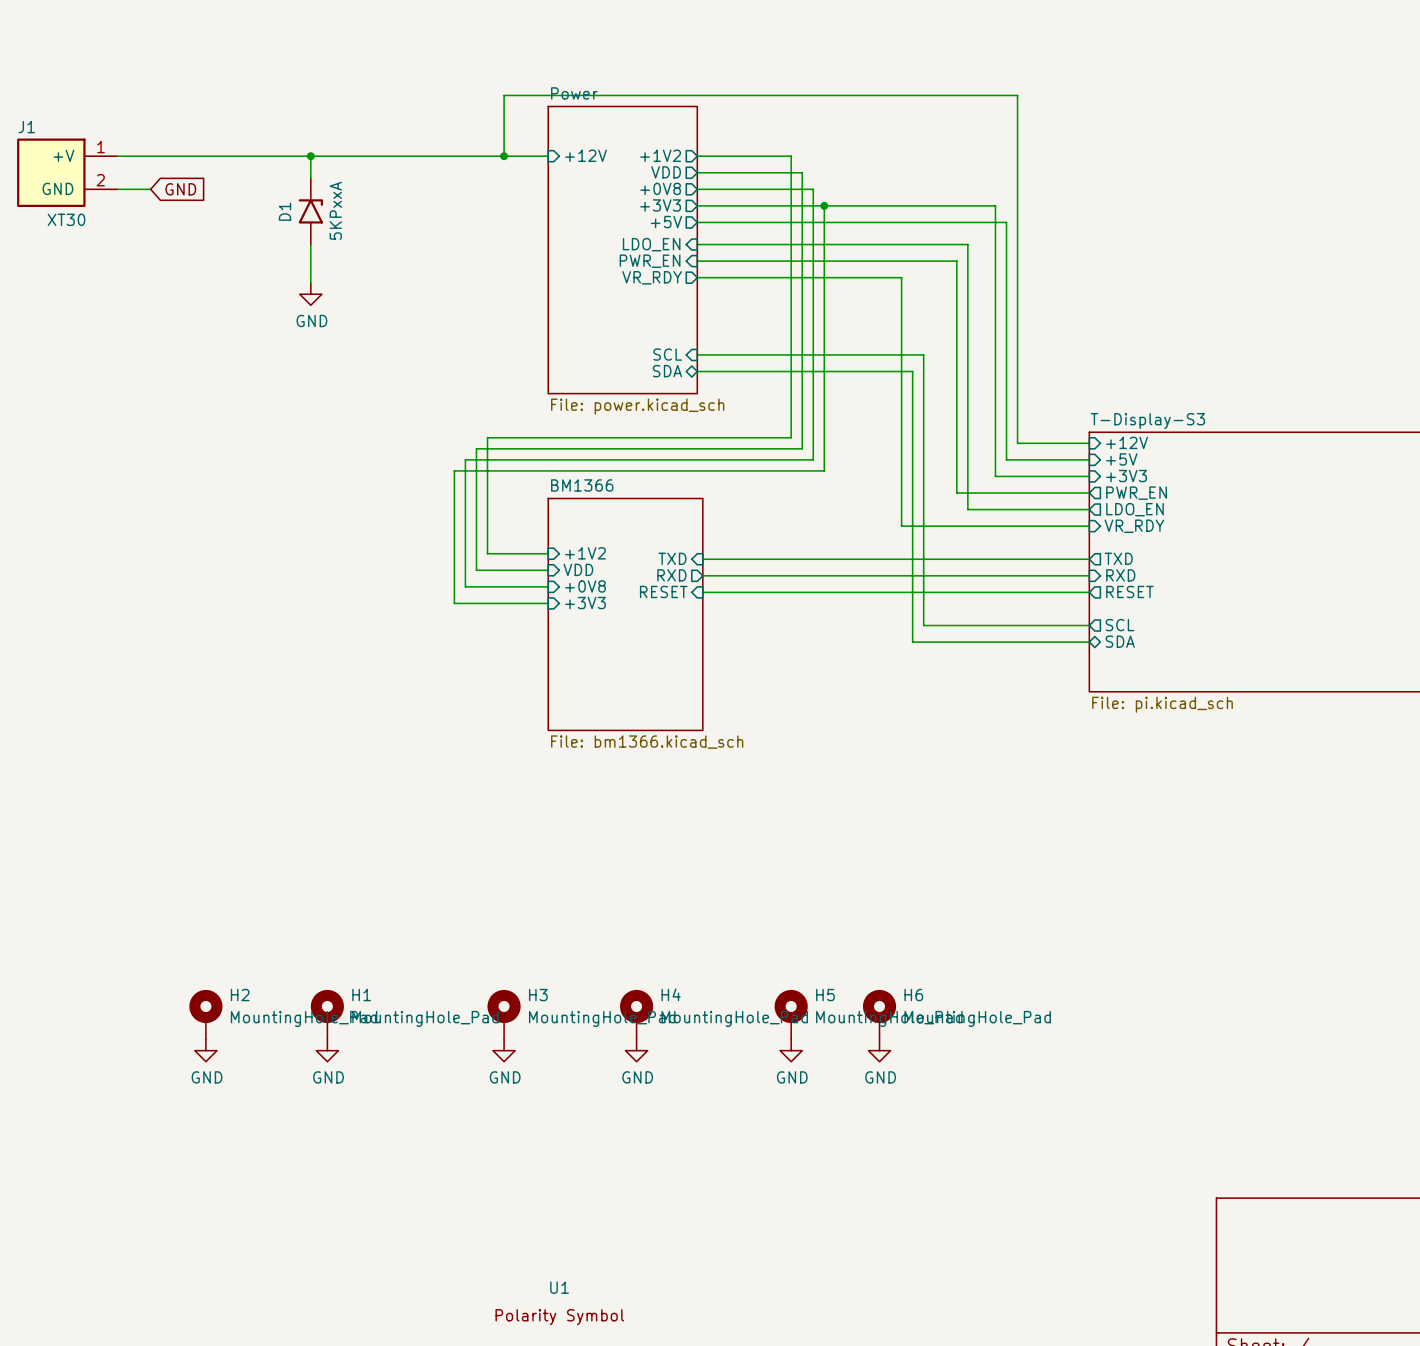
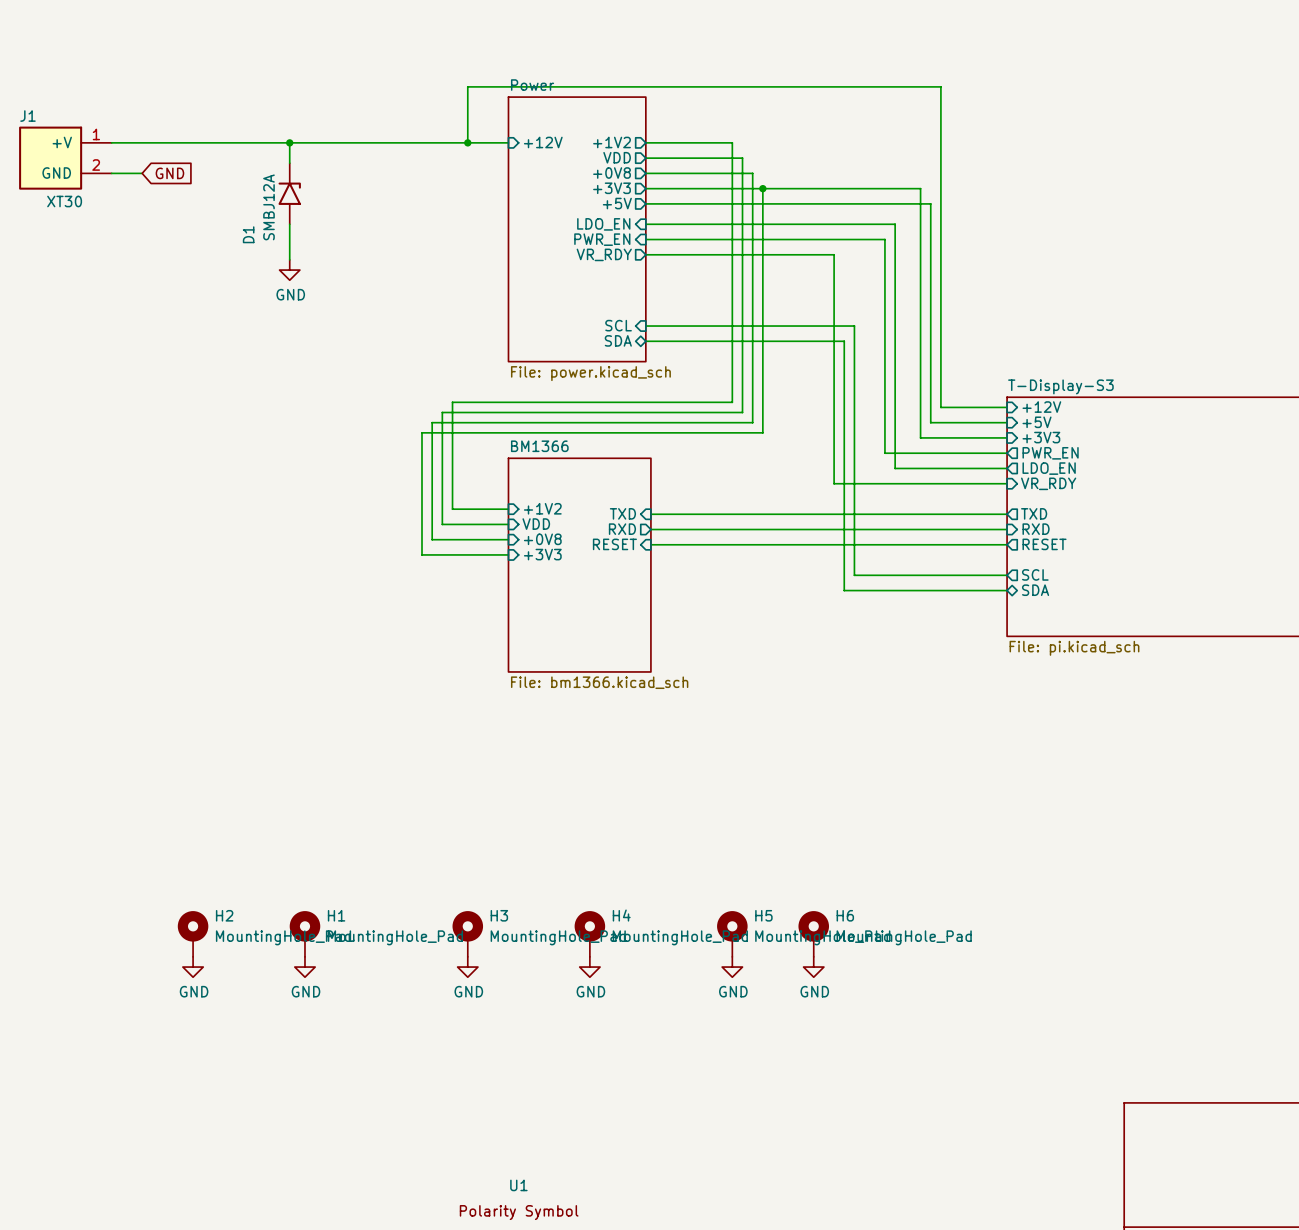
D1 value: 5KPxxA (335, 210) -> SMBJ12A (268, 207)
D1 name position: D1 (285, 211) -> D1 (248, 234)

